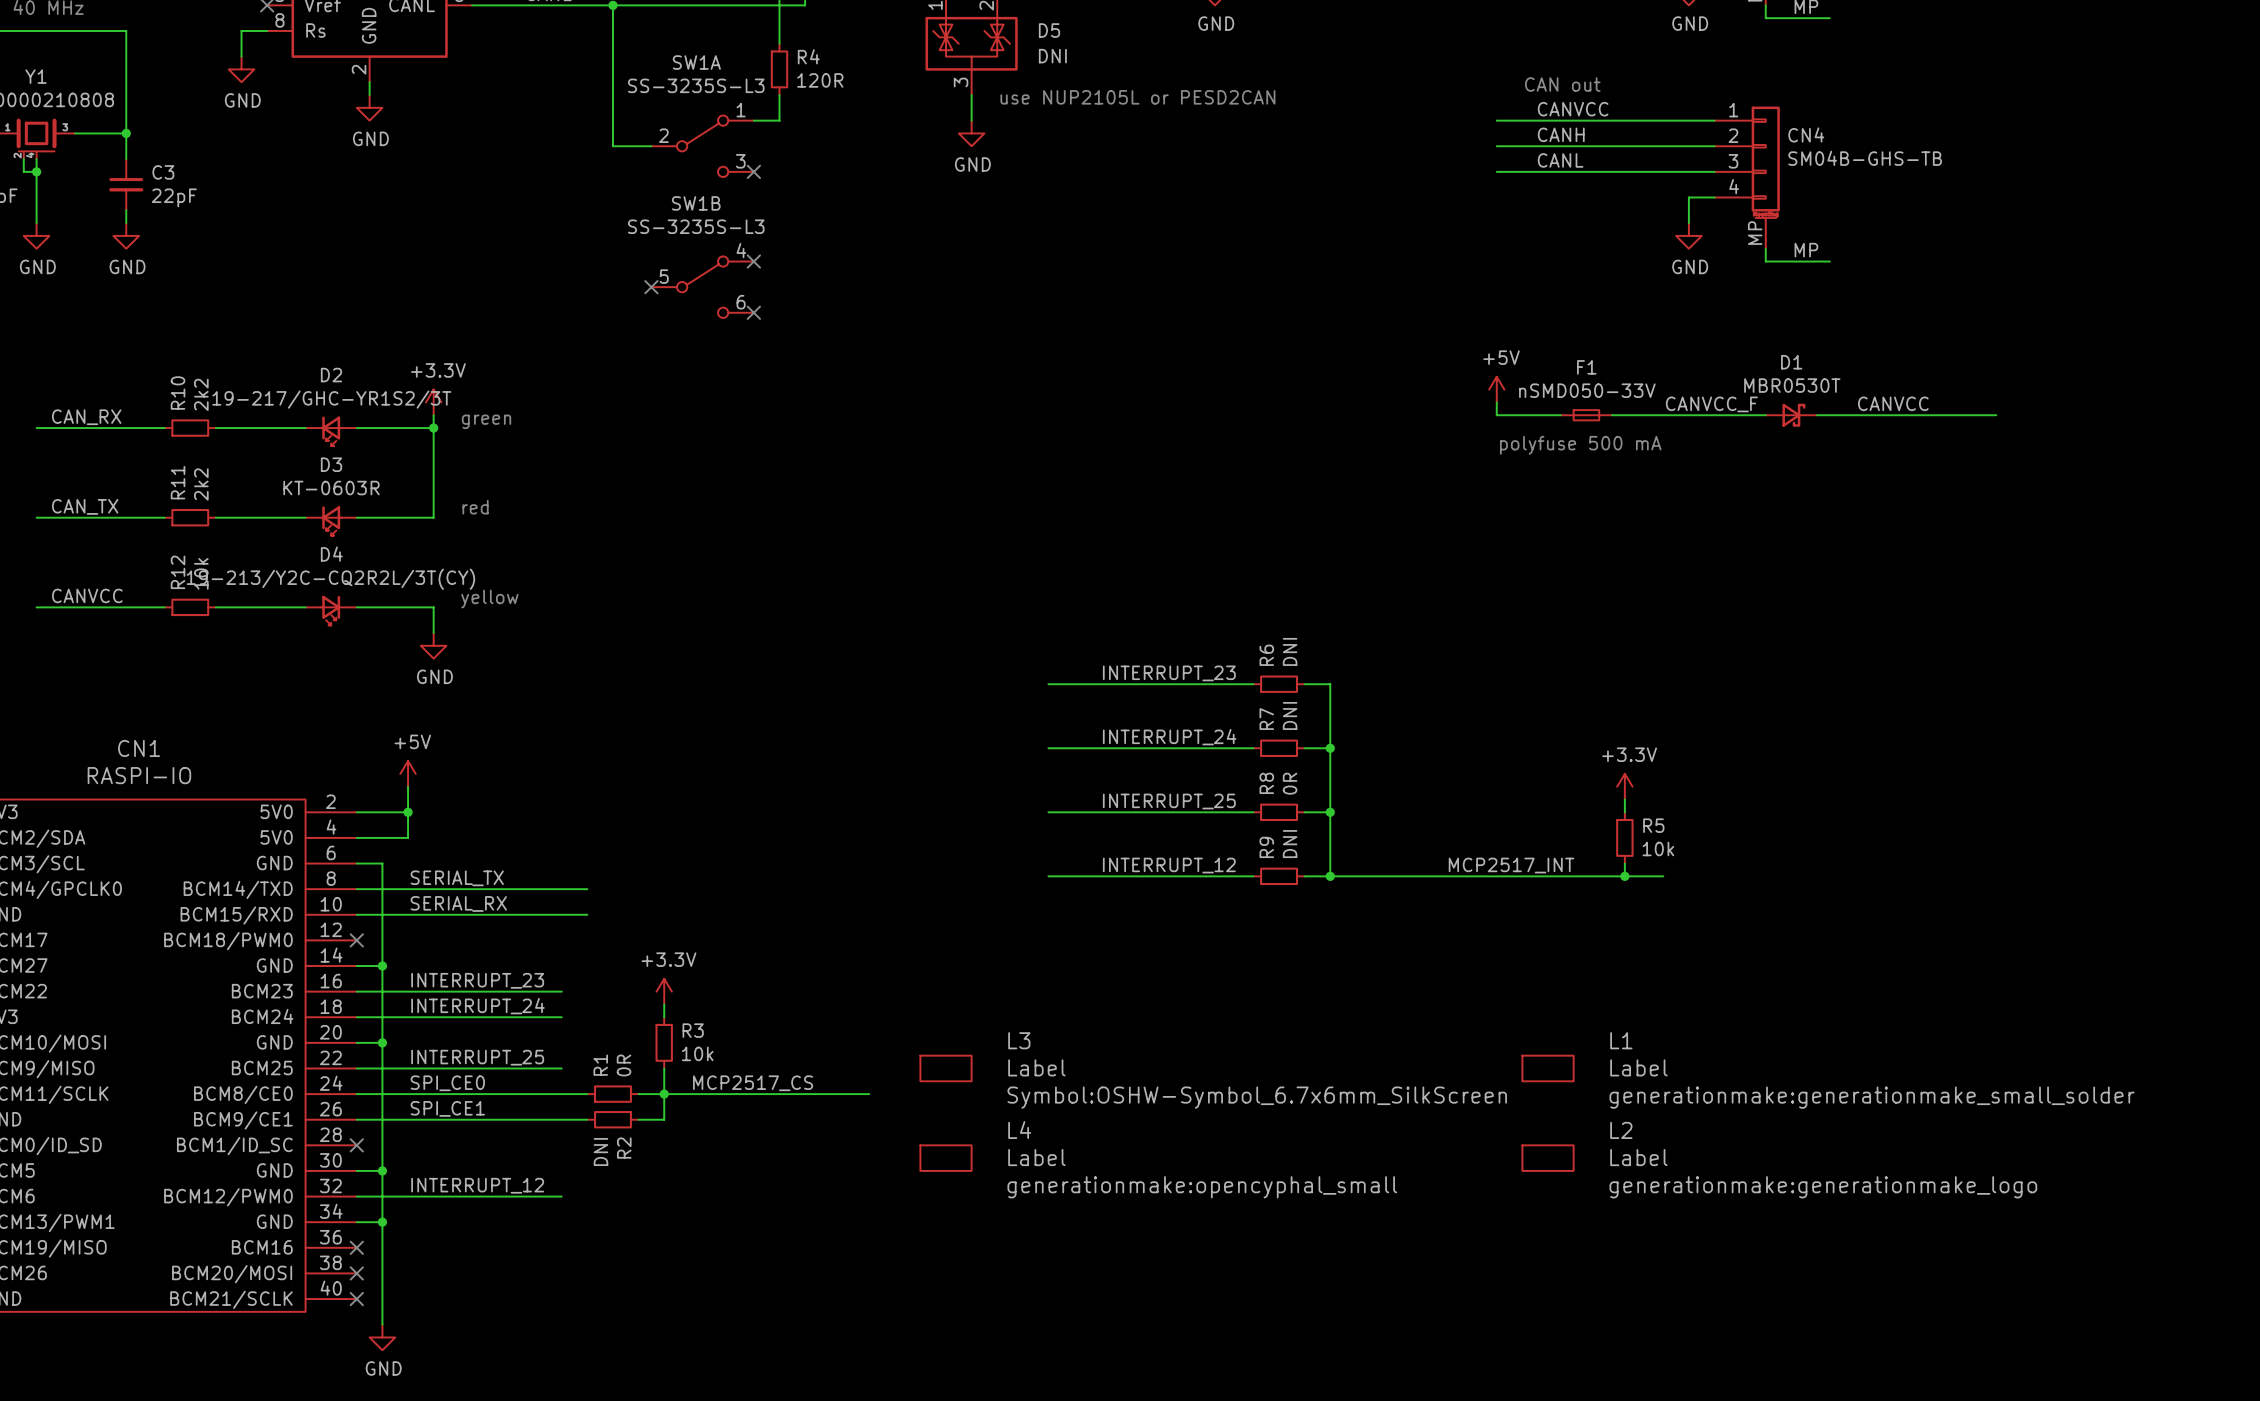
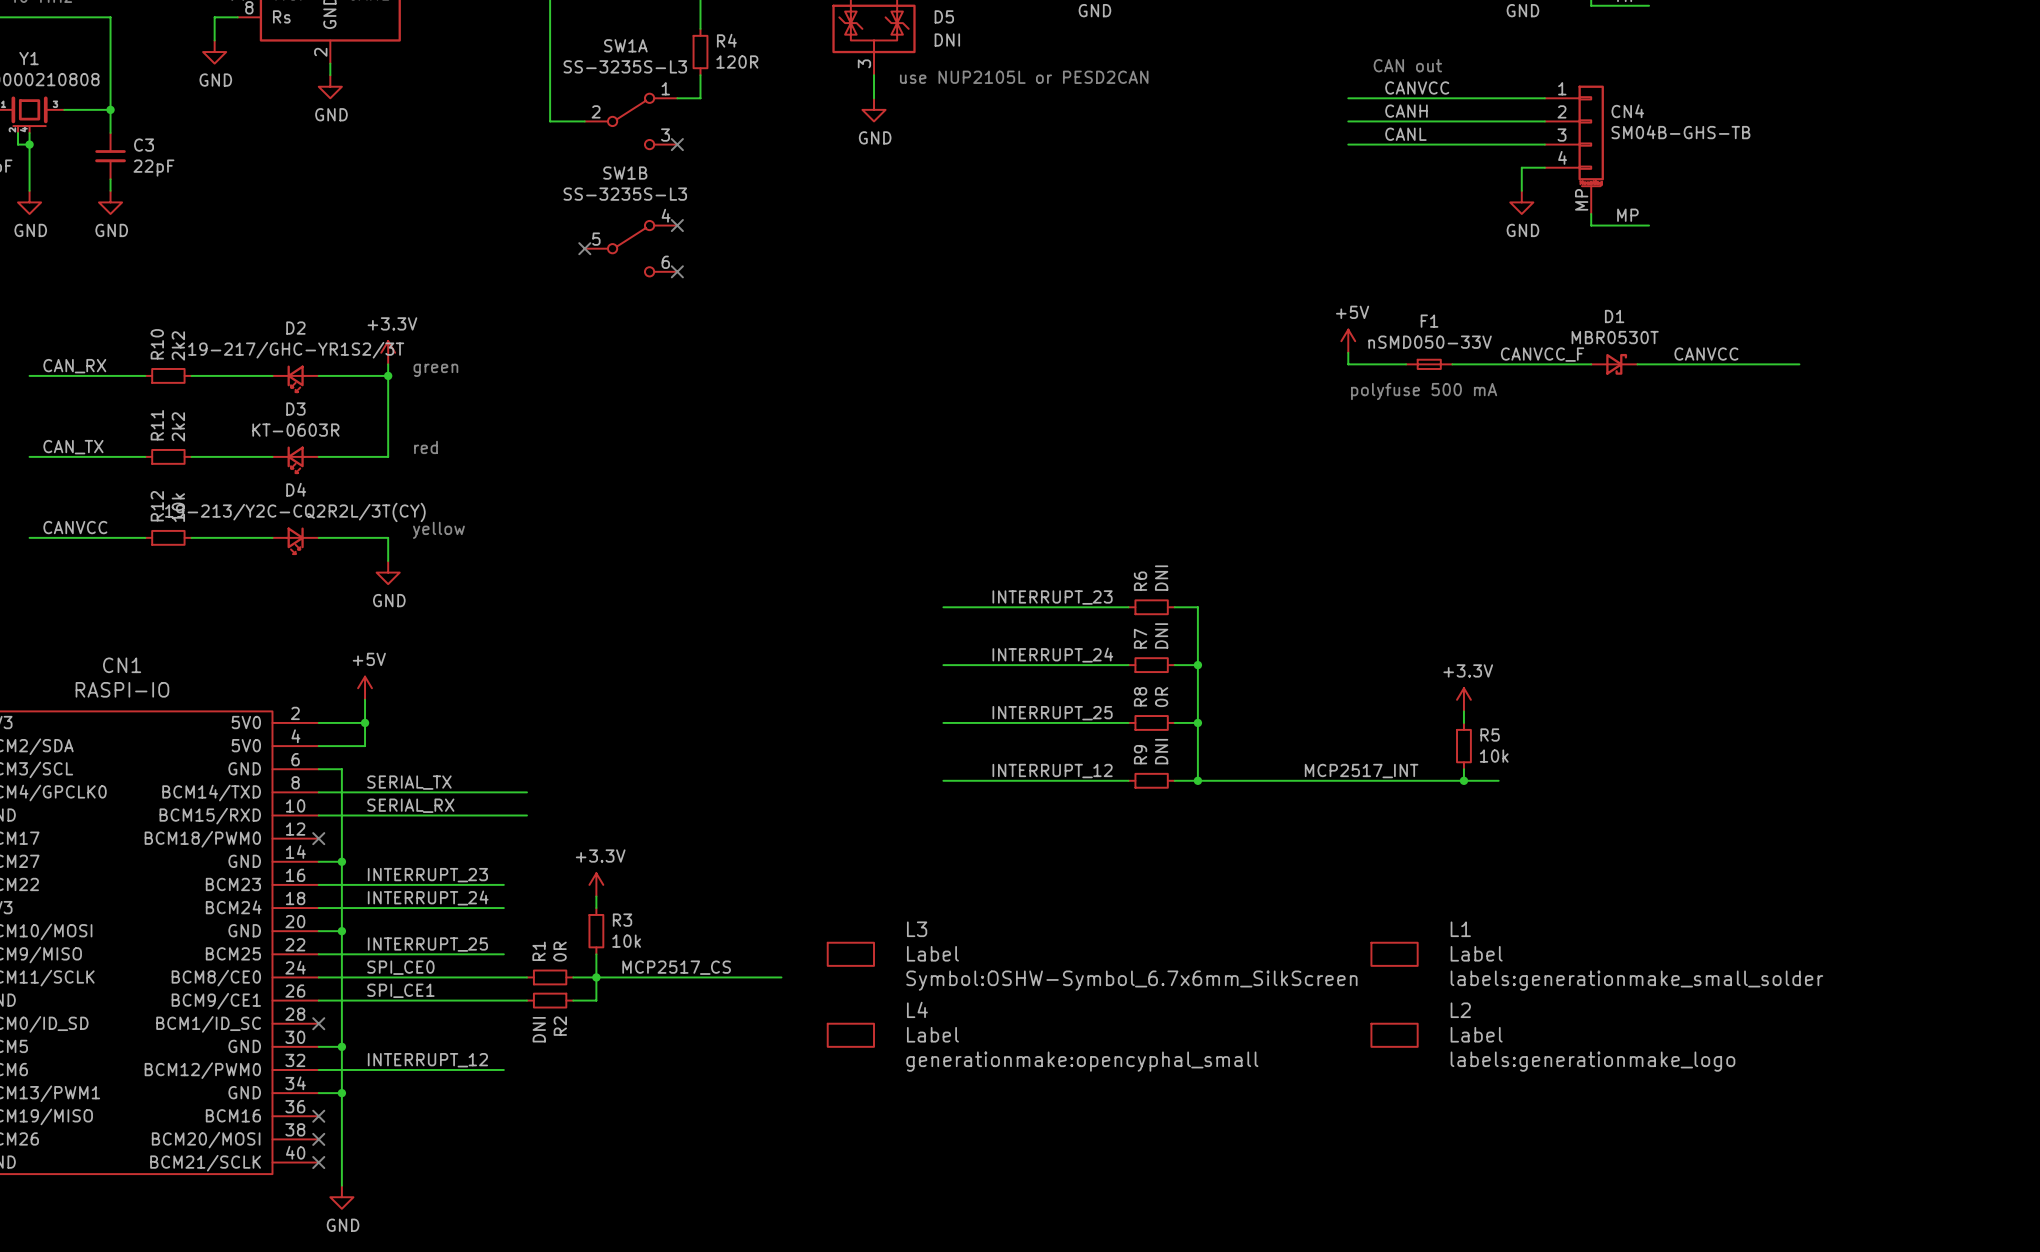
L1 text: generationmake:generationmake_small_solder (1872, 1097) -> labels:generationmake_small_solder (1636, 980)
L2 text: generationmake:generationmake_logo (1823, 1187) -> labels:generationmake_logo (1592, 1061)

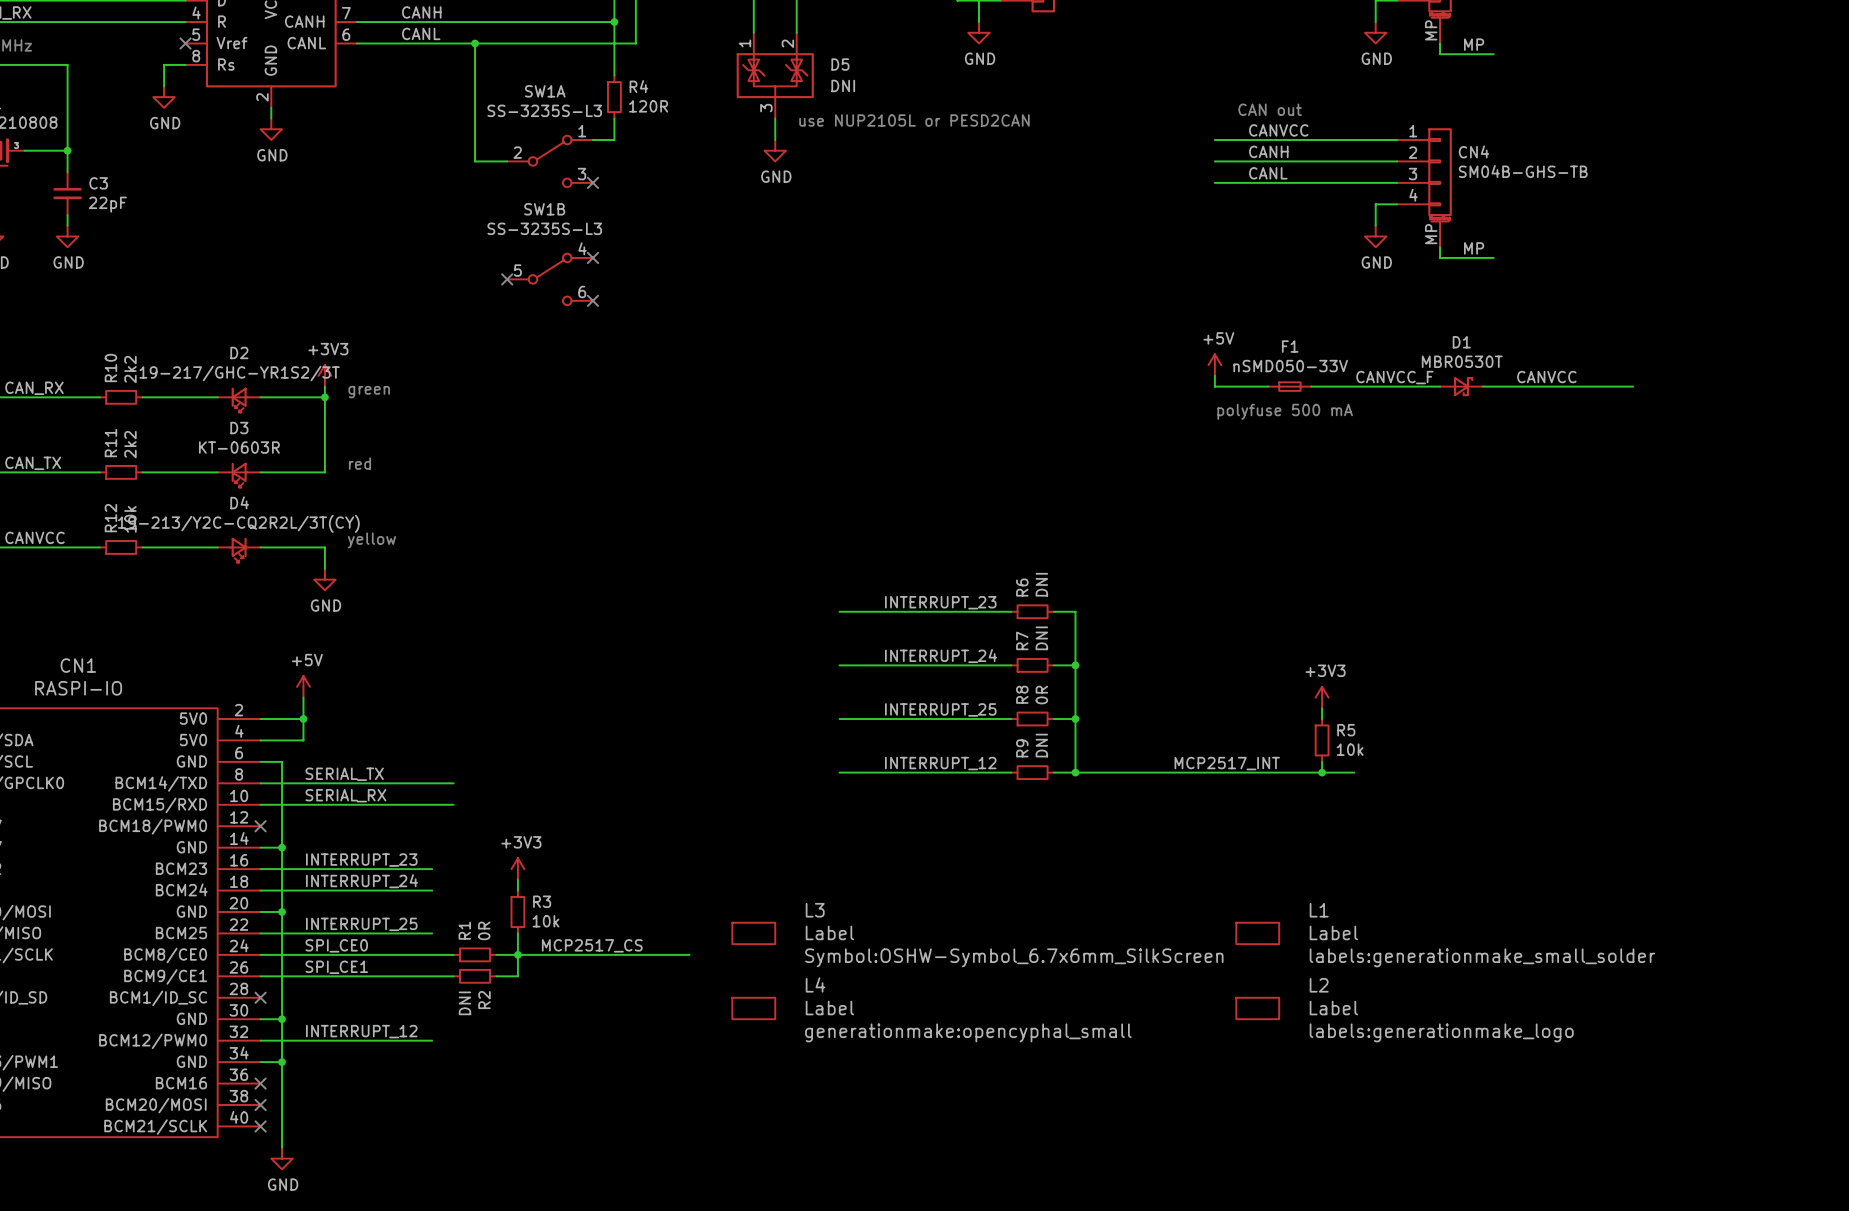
power symbol: +3.3V (388, 352) -> +3V3 (324, 375)
power symbol: +3.3V (1463, 699) -> +3V3 (1322, 697)
power symbol: +3.3V (596, 884) -> +3V3 (517, 869)

